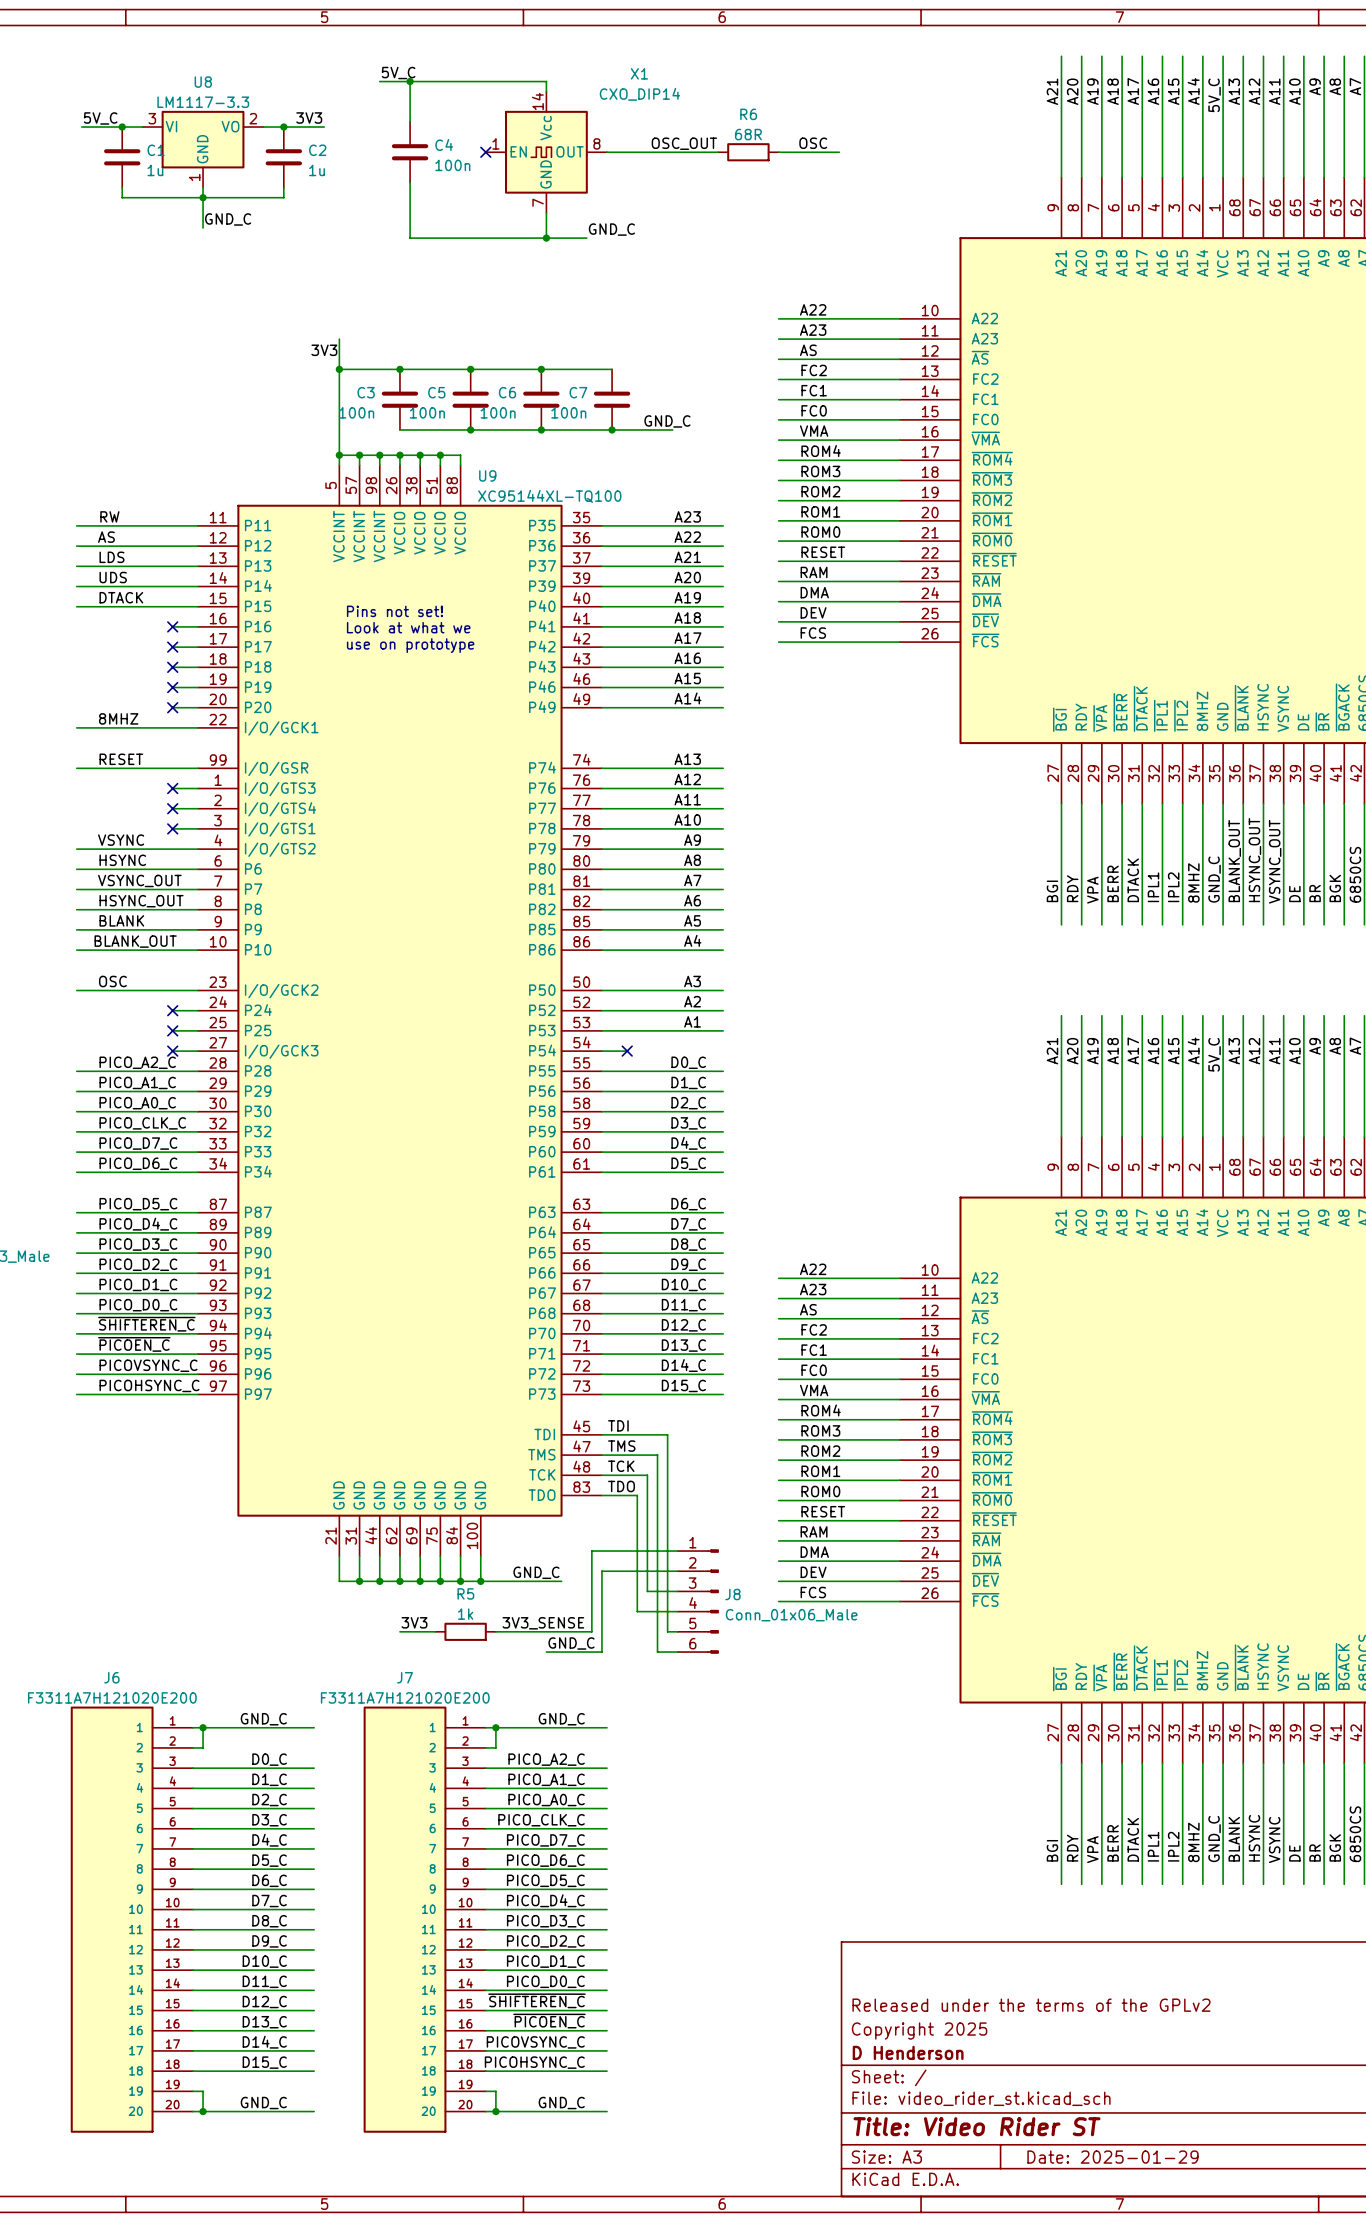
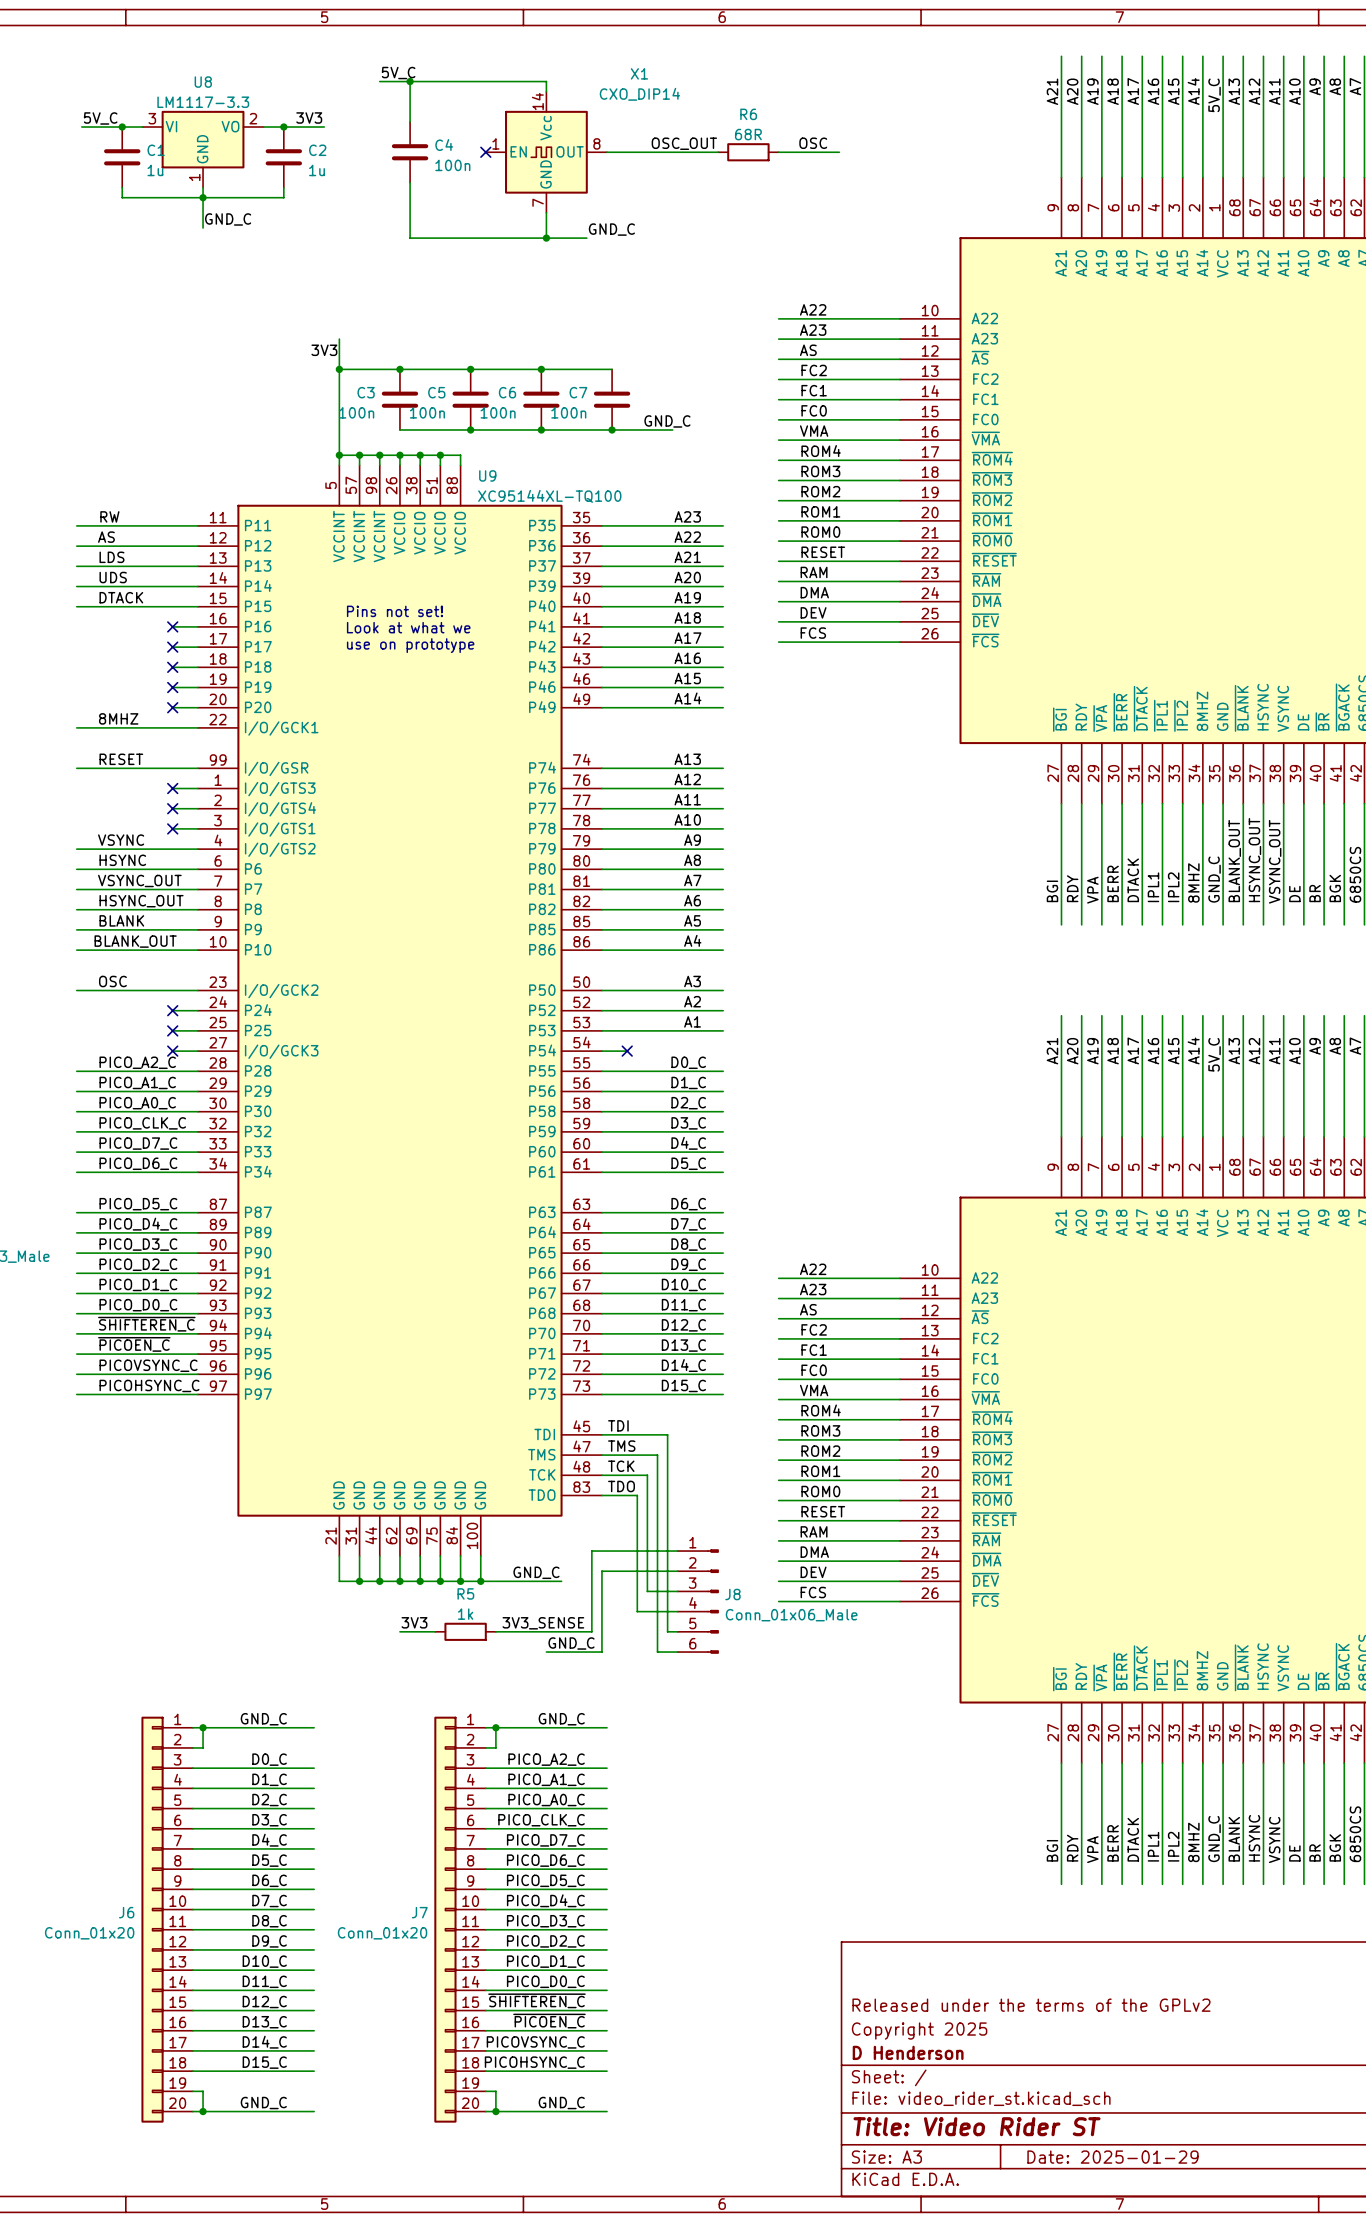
J6 name position: J6 (111, 1677) -> J6 (126, 1912)
J7 name position: J7 (405, 1677) -> J7 (419, 1912)
J6 value: F3311A7H121020E200 (112, 1697) -> Conn_01x20 (89, 1933)
J7 value: F3311A7H121020E200 (405, 1697) -> Conn_01x20 (382, 1933)
J6 symbol: [70, 1706, 193, 2133] -> [141, 1716, 193, 2123]
J7 symbol: [363, 1706, 486, 2133] -> [434, 1716, 486, 2123]

